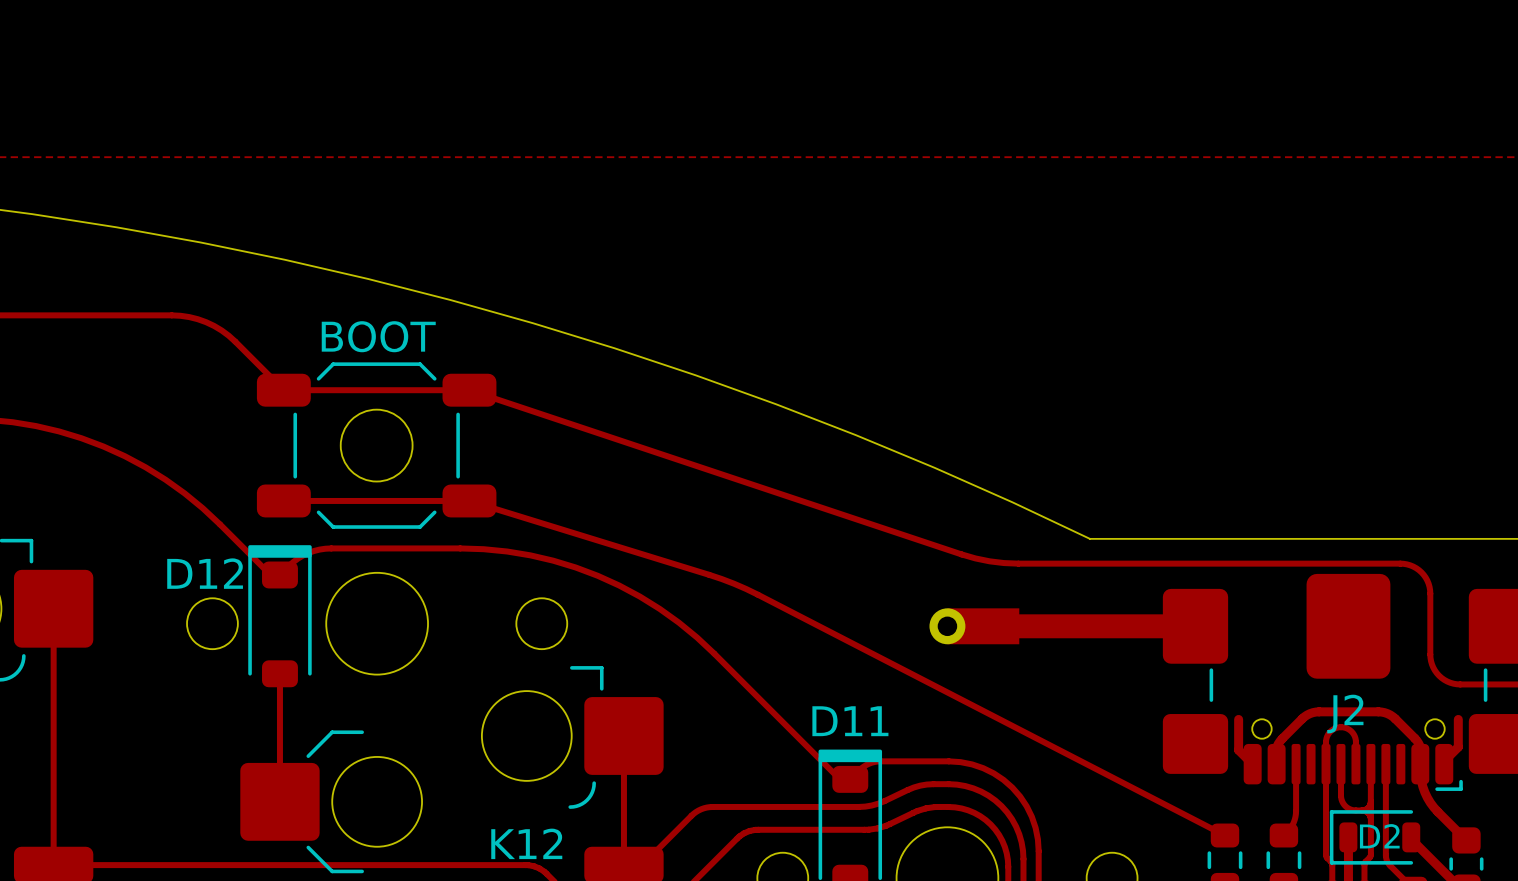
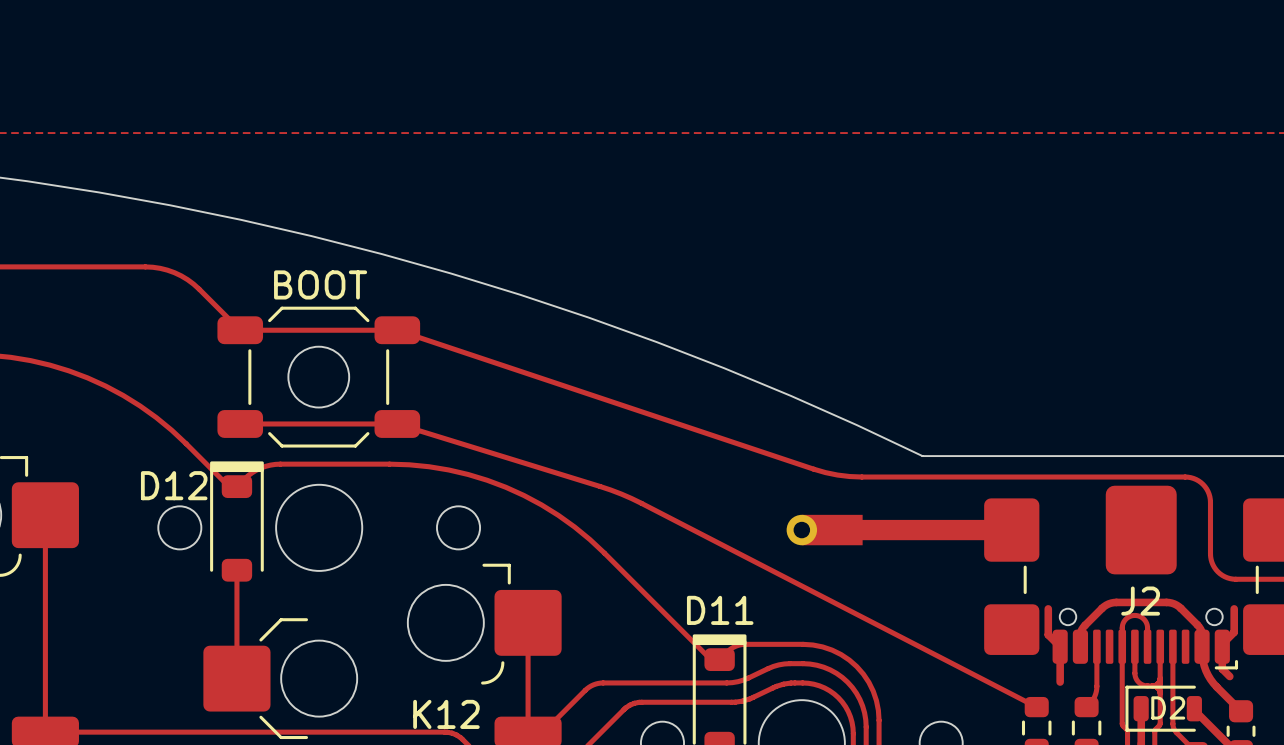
top track: none -> (1060, 644) (1060, 682)
top track: none -> (1222, 644) (1222, 669) (1229, 676)

